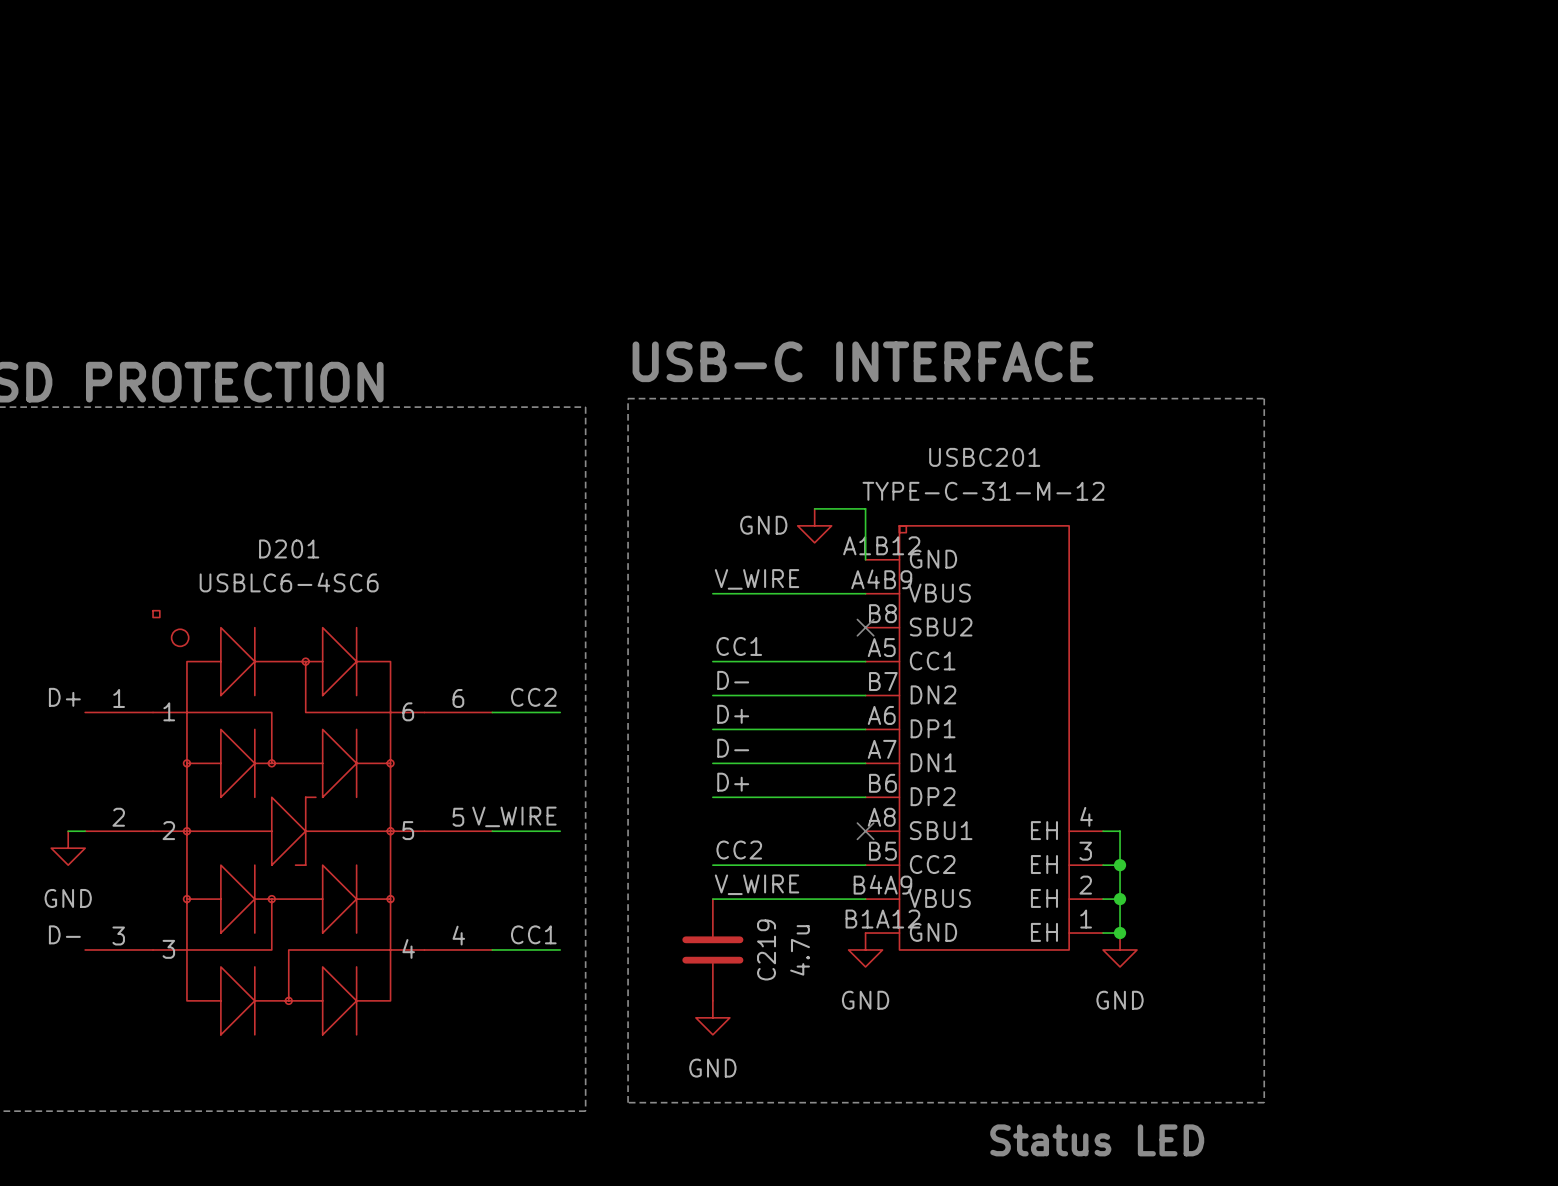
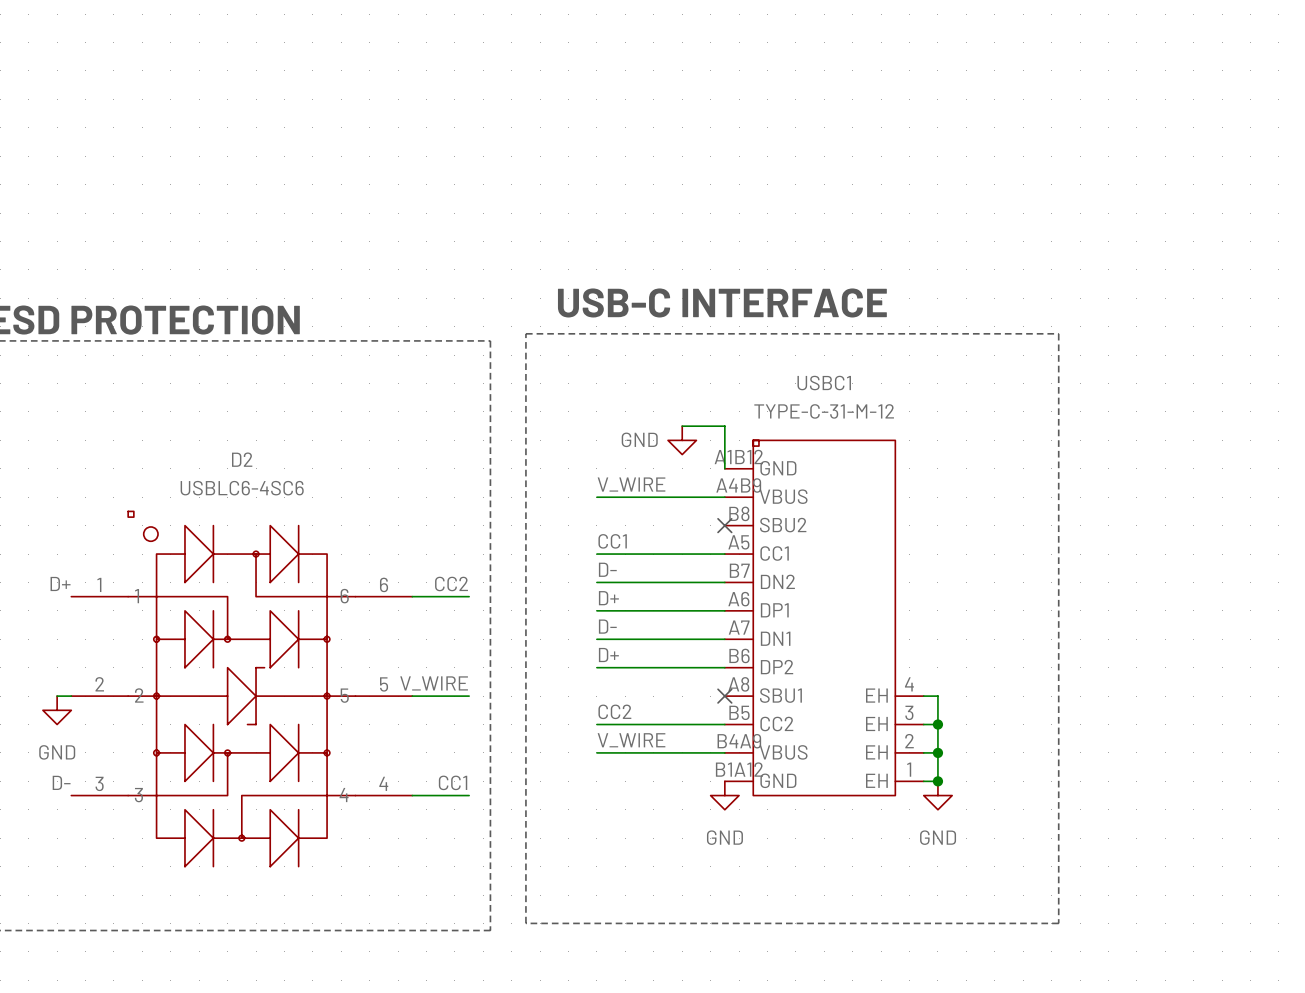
USBC201 name: USBC201 (984, 457) -> USBC1 (824, 383)
D201 name: D201 (289, 548) -> D2 (242, 459)
C219: 4.7u (712, 949) -> none
power symbol: GND (712, 1017) -> none
text: Status LED (1097, 1140) -> none

